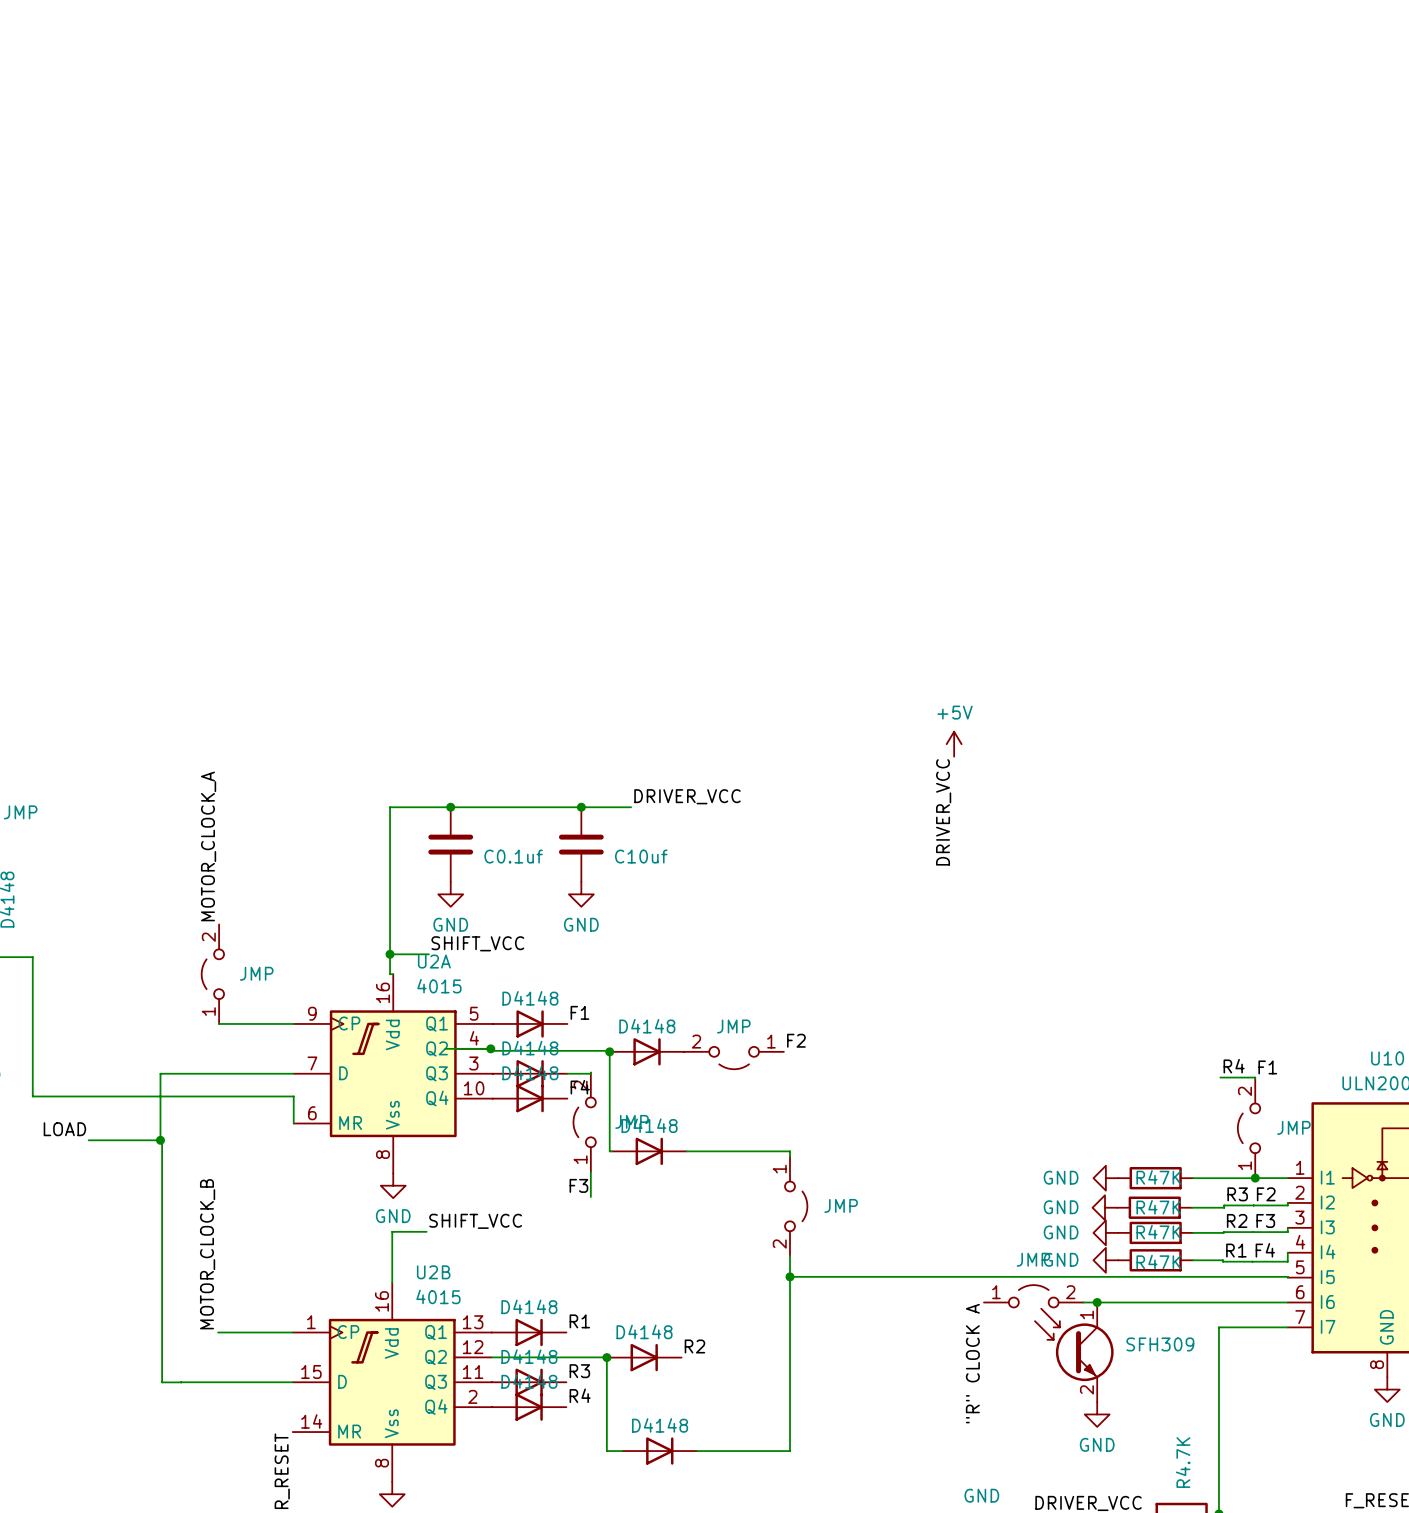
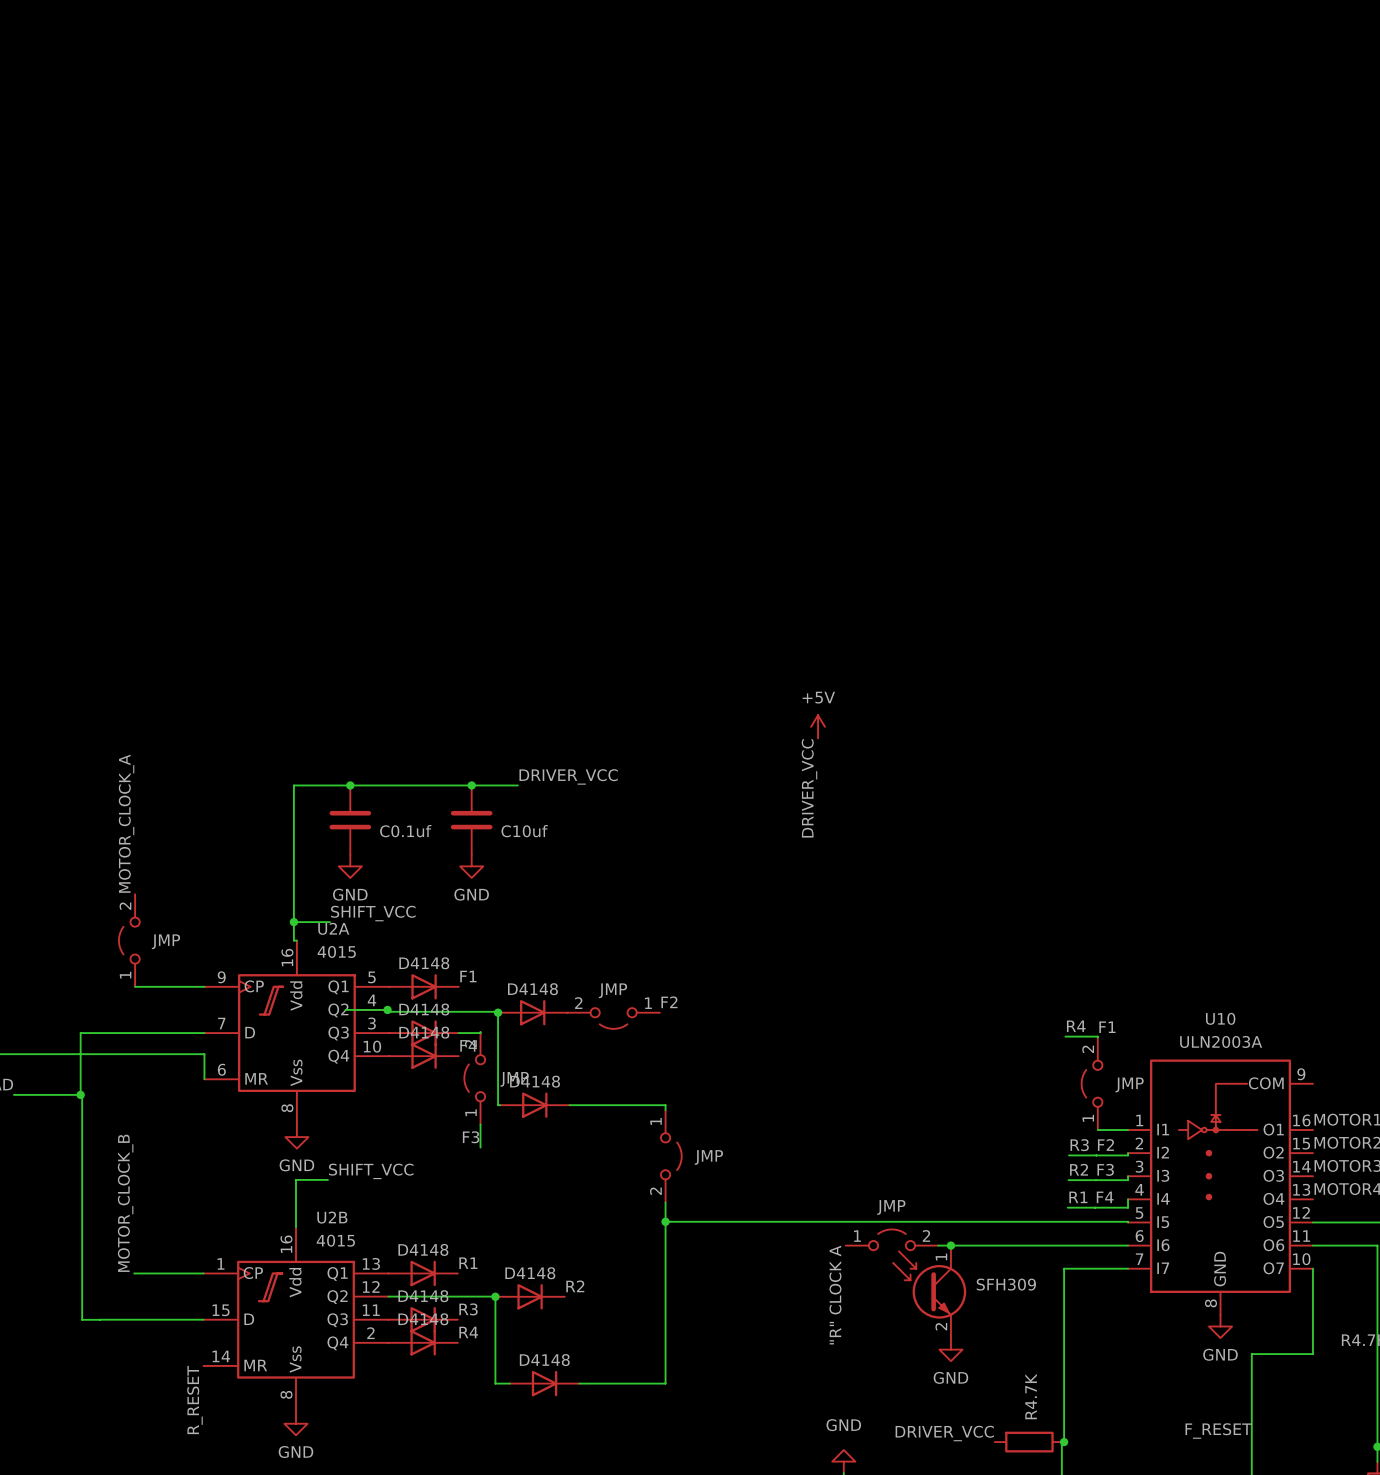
power symbol: GND (1105, 1178) -> none
part: R47K (1155, 1178) -> none
wire: (1192, 1178) (1255, 1178) -> none
junction: (1255, 1178) -> none
wire: (1224, 1205) (1224, 1207) (1192, 1207) -> none
power symbol: GND (1104, 1207) -> none
part: R47K (1154, 1207) -> none
power symbol: GND (1105, 1232) -> none
part: R47K (1155, 1232) -> none
wire: (1223, 1232) (1192, 1232) -> none
power symbol: GND (1105, 1260) -> none
part: R47K (1155, 1260) -> none
wire: (1192, 1260) (1222, 1261) -> none

